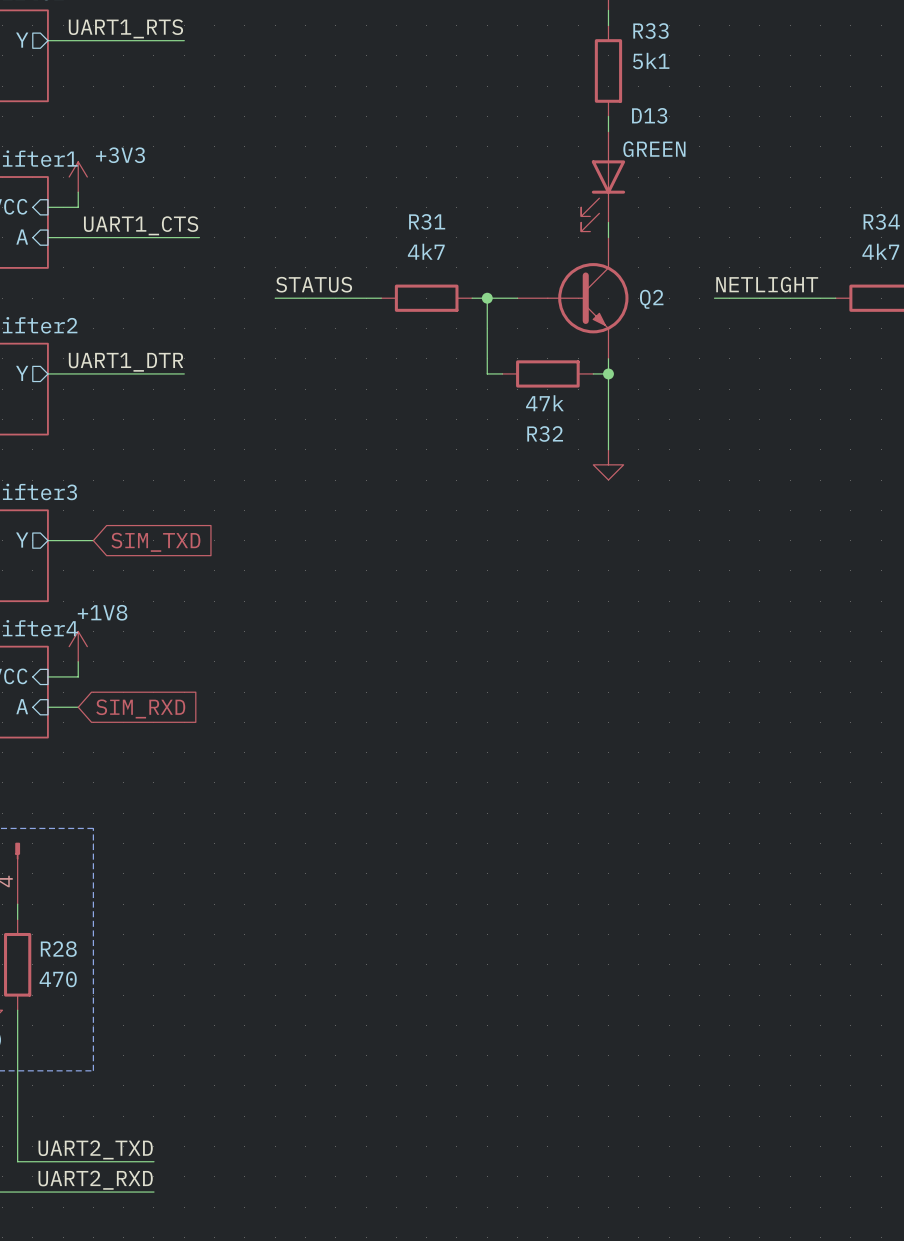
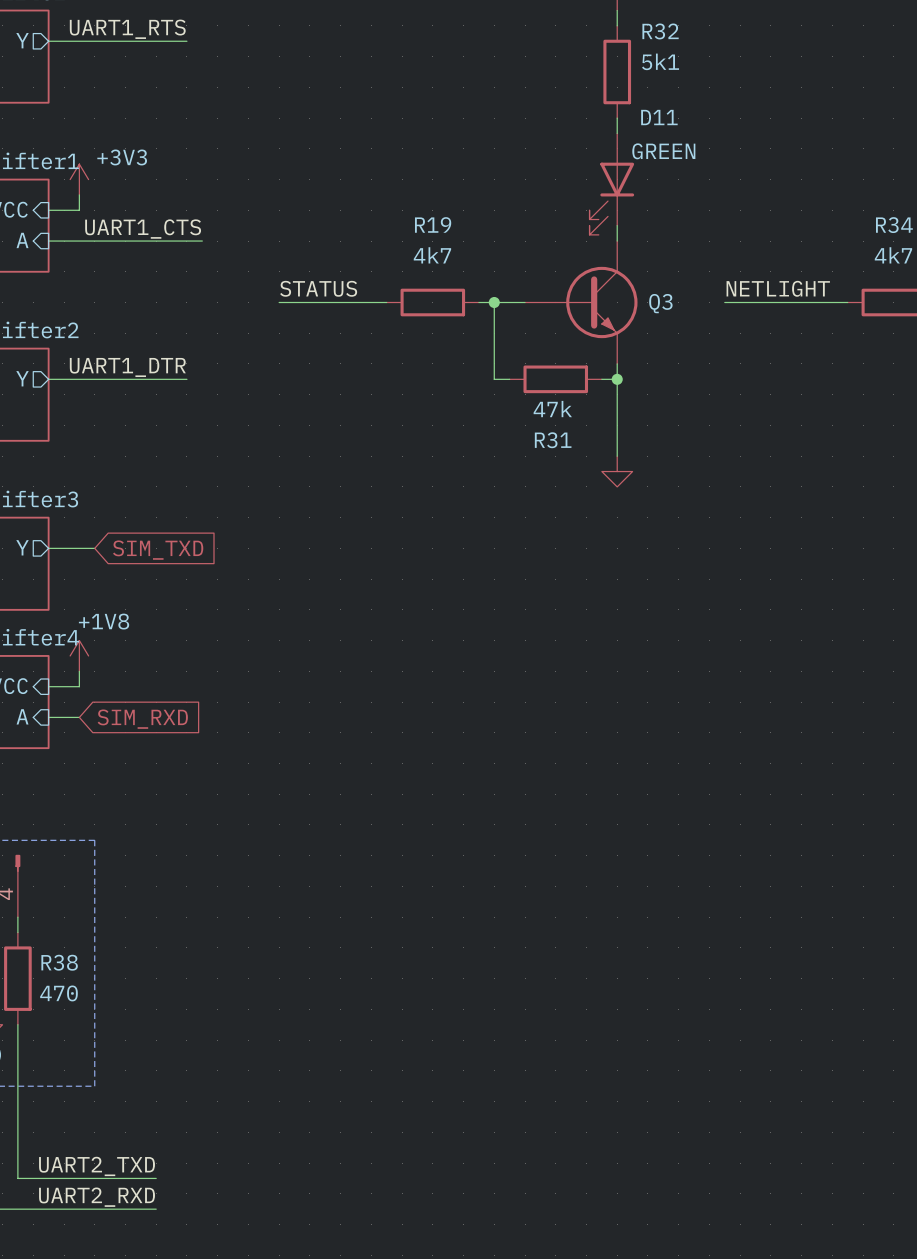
R33 name: R33 (650, 31) -> R32 (660, 31)
D13 name: D13 (649, 115) -> D11 (659, 117)
R31 name: R31 (427, 221) -> R19 (433, 224)
Q2 name: Q2 (651, 299) -> Q3 (660, 303)
R32 name: R32 (545, 433) -> R31 (553, 440)
R28 name: R28 (58, 949) -> R38 (59, 962)

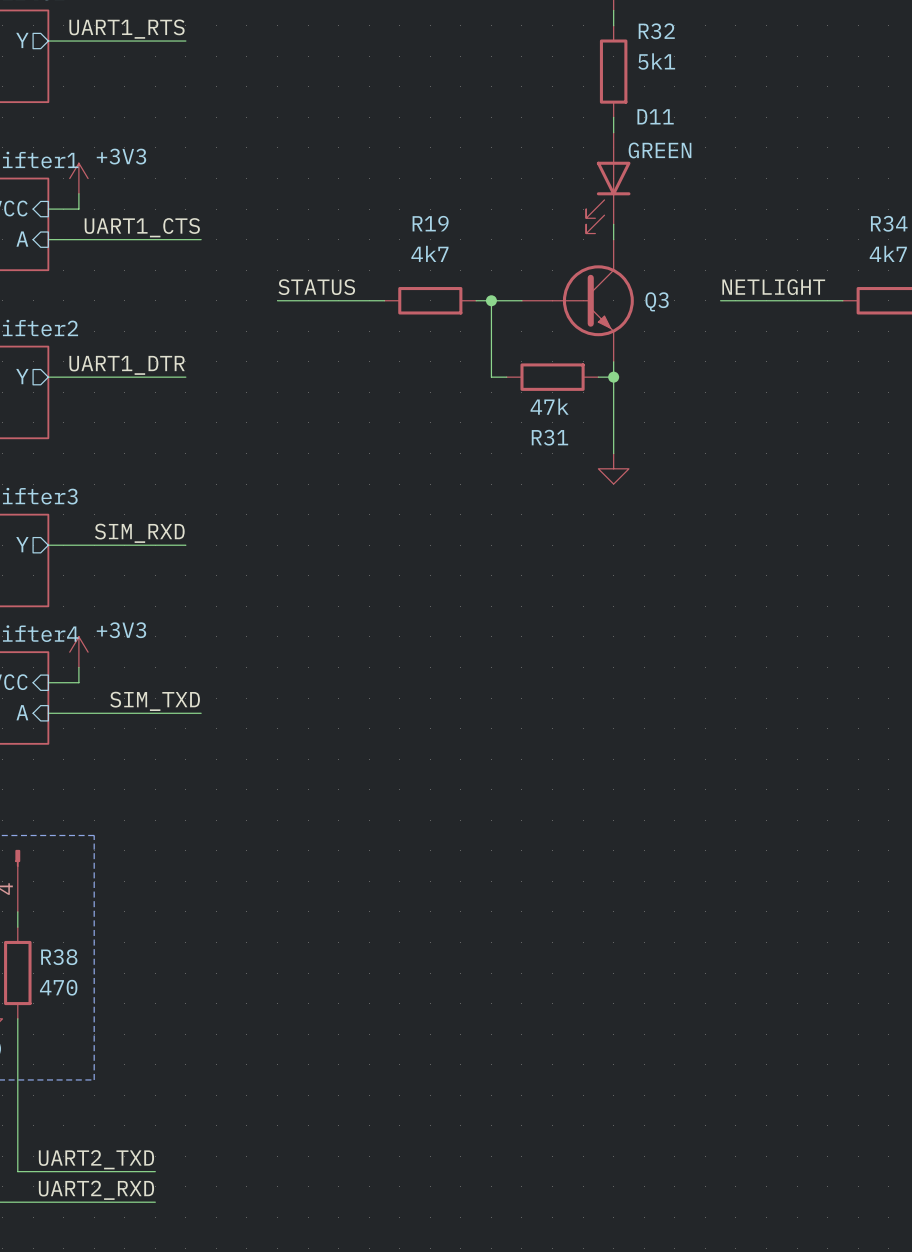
label: none -> SIM_RXD (139, 533)
wire: none -> (94, 545) (185, 545)
global label: SIM_TXD (158, 550) -> none
power symbol: +1V8 (79, 655) -> +3V3 (78, 652)
label: none -> SIM_TXD (155, 701)
wire: none -> (78, 713) (201, 713)
global label: SIM_RXD (142, 719) -> none

